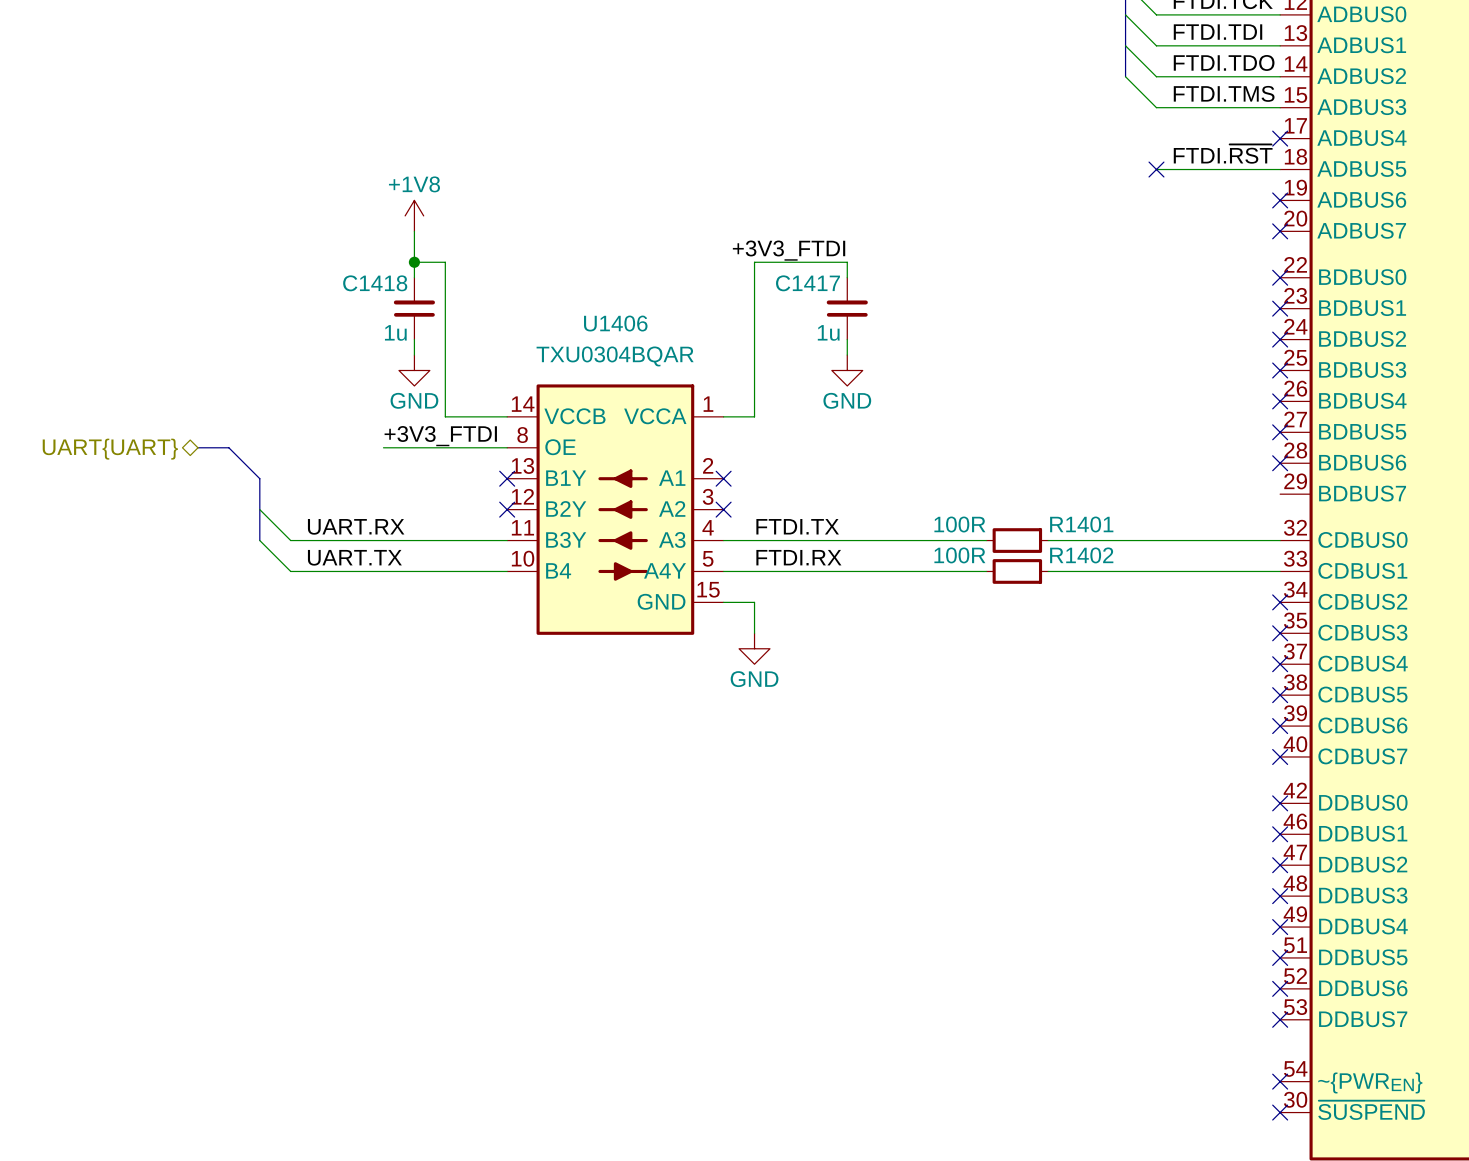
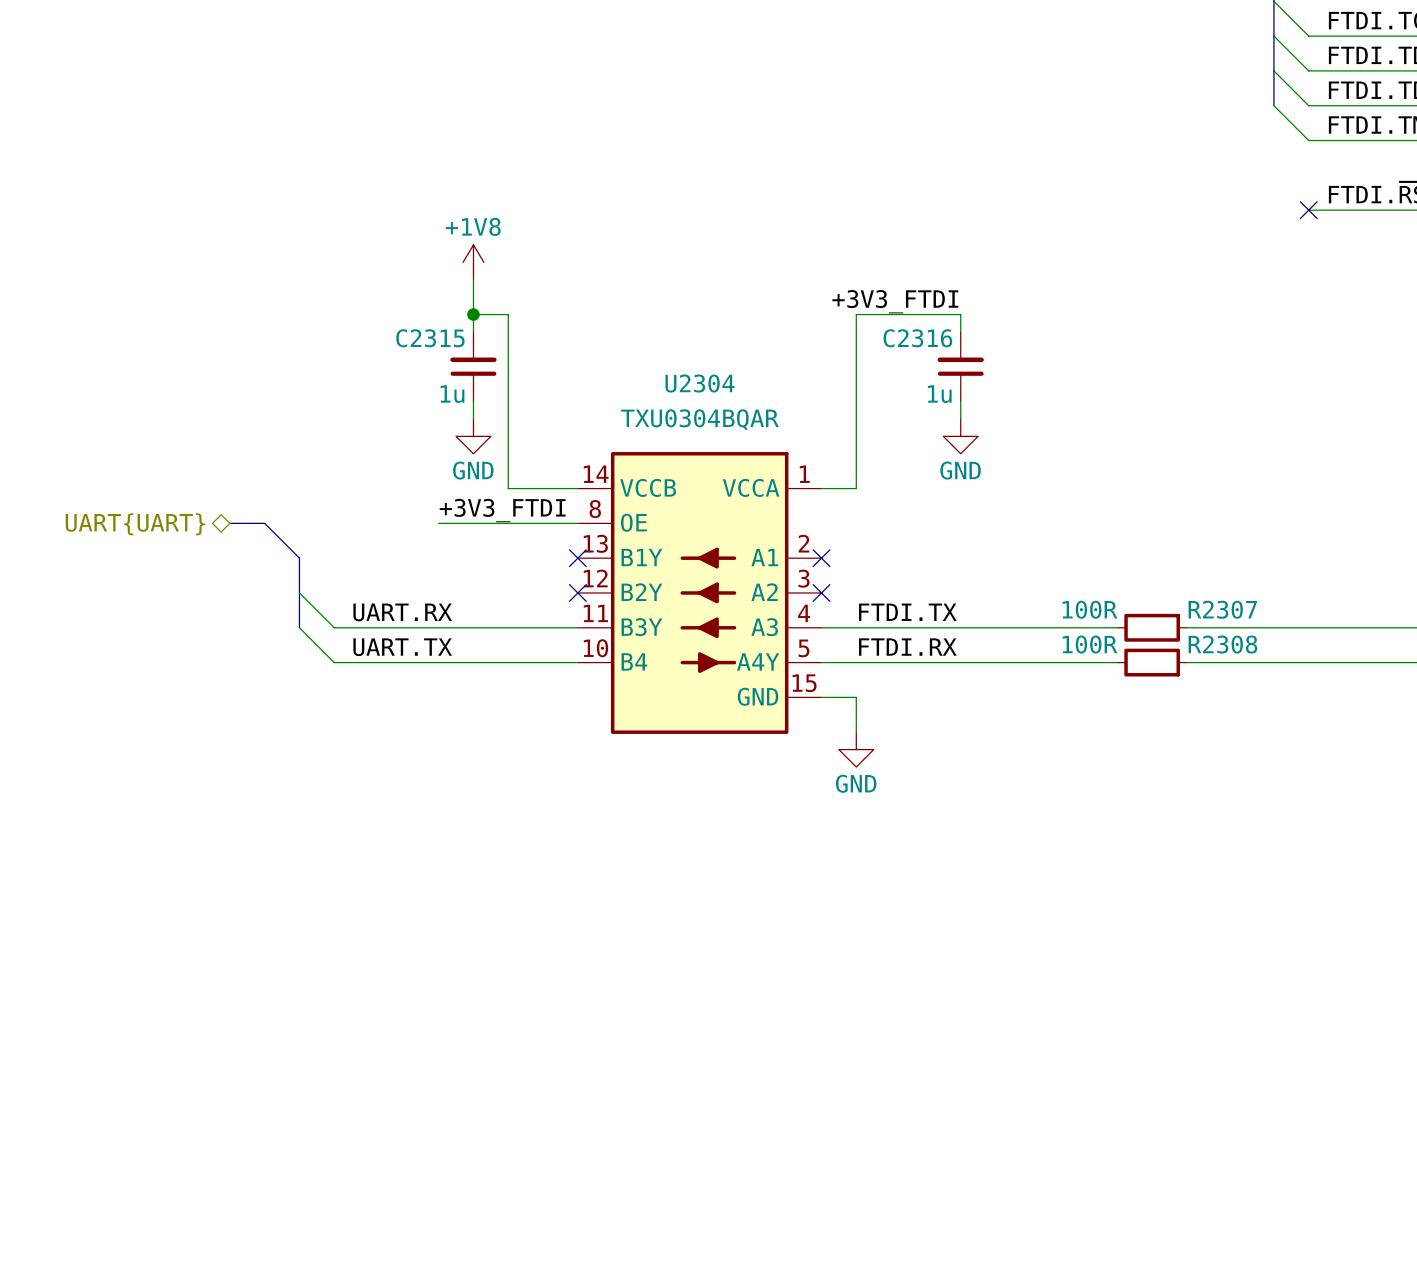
C1418 name: C1418 (375, 283) -> C2315 (430, 338)
C1417 name: C1417 (808, 283) -> C2316 (917, 338)
U1406 name: U1406 (615, 323) -> U2304 (699, 383)
R1401 name: R1401 (1081, 524) -> R2307 (1222, 609)
R1402 name: R1402 (1081, 555) -> R2308 (1222, 644)

